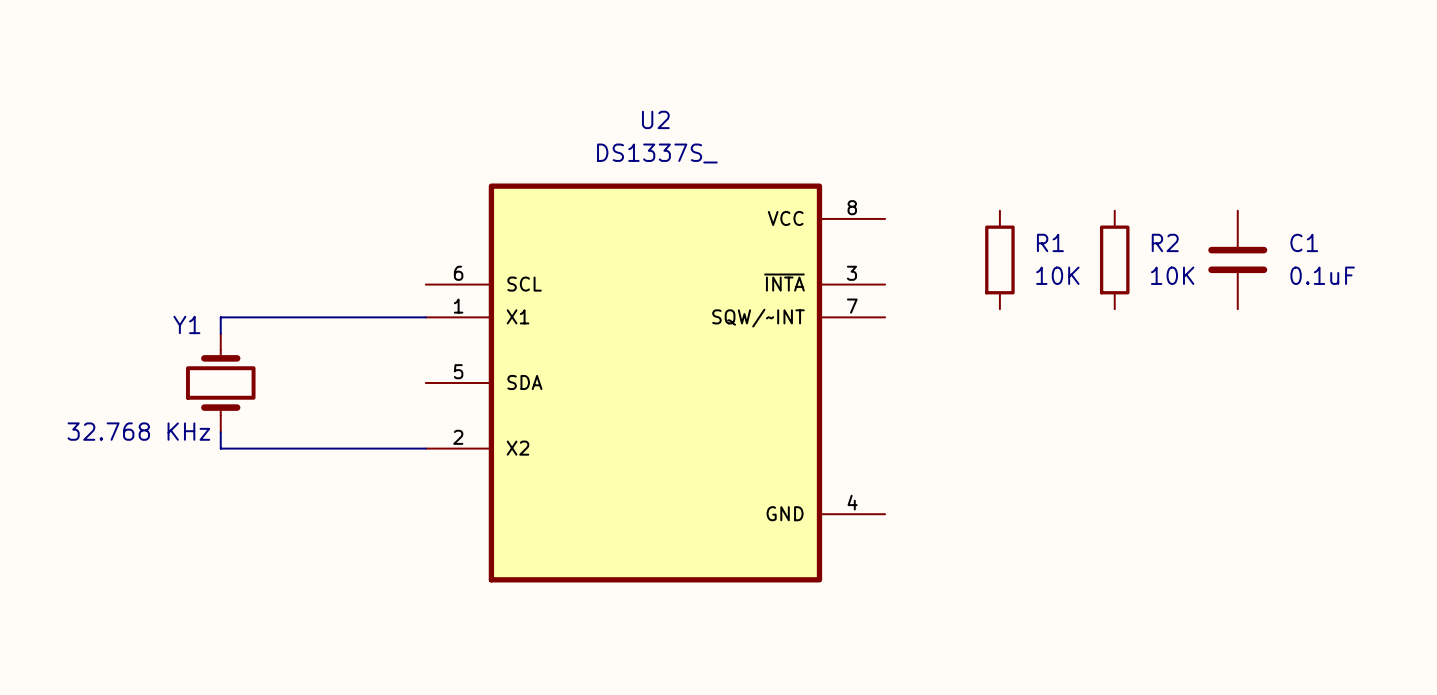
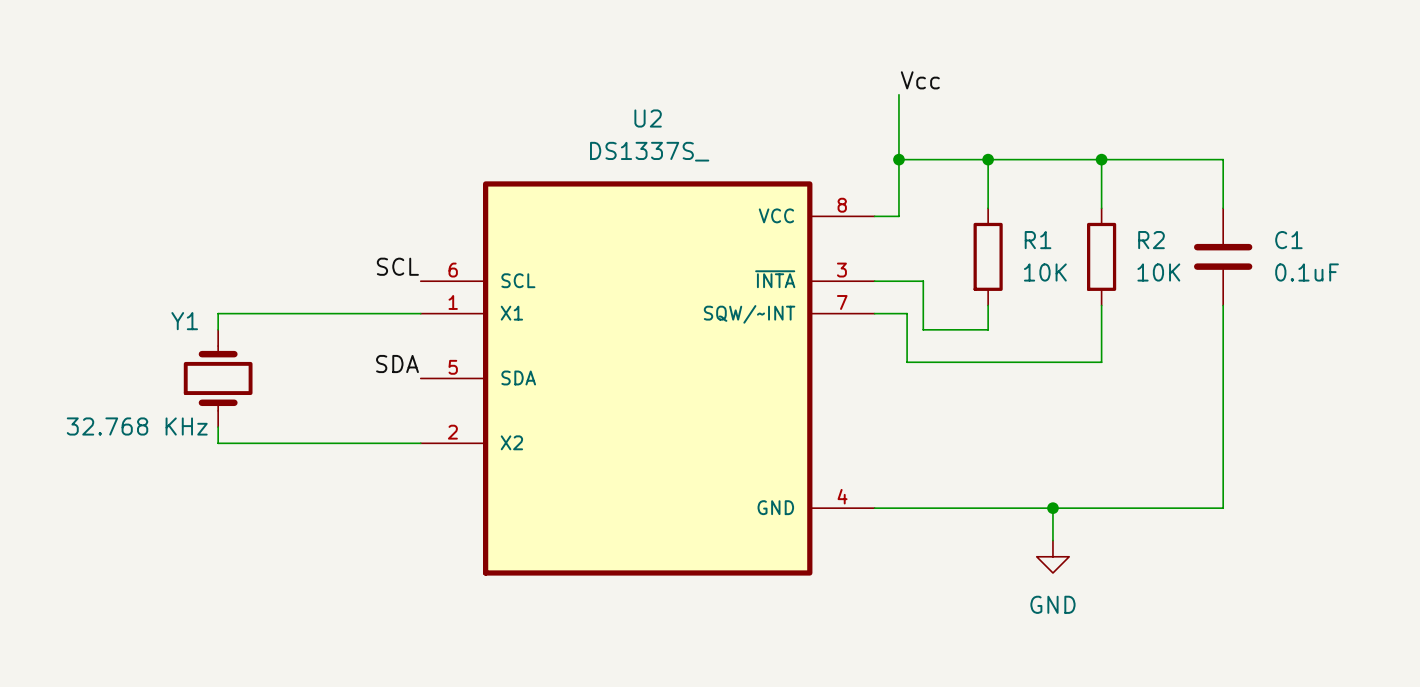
label: none -> Vcc (920, 80)
wire: none -> (898, 94) (898, 216) (874, 216)
wire: none -> (898, 159) (1223, 159) (1223, 208)
junction: none -> (898, 159)
wire: none -> (988, 159) (988, 208)
junction: none -> (988, 159)
wire: none -> (1101, 159) (1101, 208)
junction: none -> (1101, 159)
label: none -> SCL (397, 266)
wire: none -> (874, 281) (923, 281) (923, 329) (988, 329) (988, 305)
wire: none -> (1101, 305) (1101, 362) (907, 362) (907, 313) (874, 313)
wire: none -> (1223, 305) (1223, 508) (874, 508)
label: none -> SDA (397, 364)
wire: none -> (1052, 508) (1052, 540)
junction: none -> (1052, 508)
power symbol: none -> GND (1052, 556)

